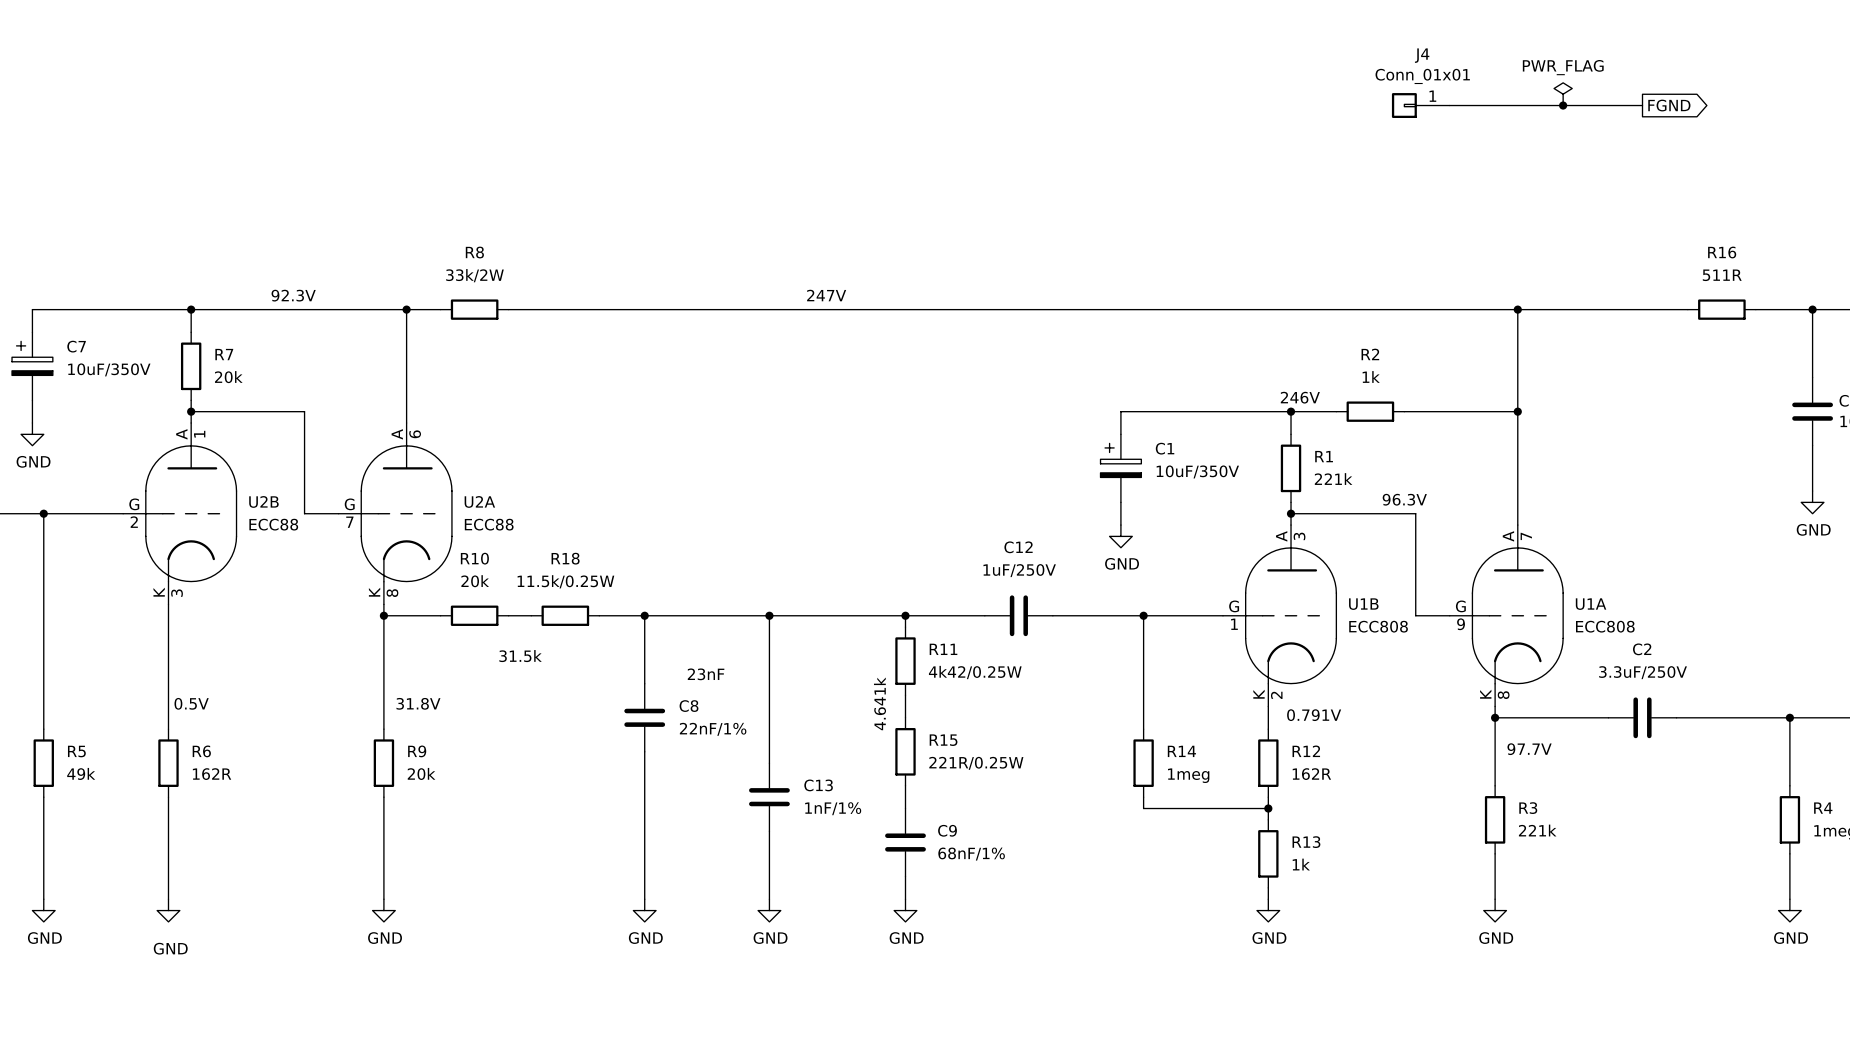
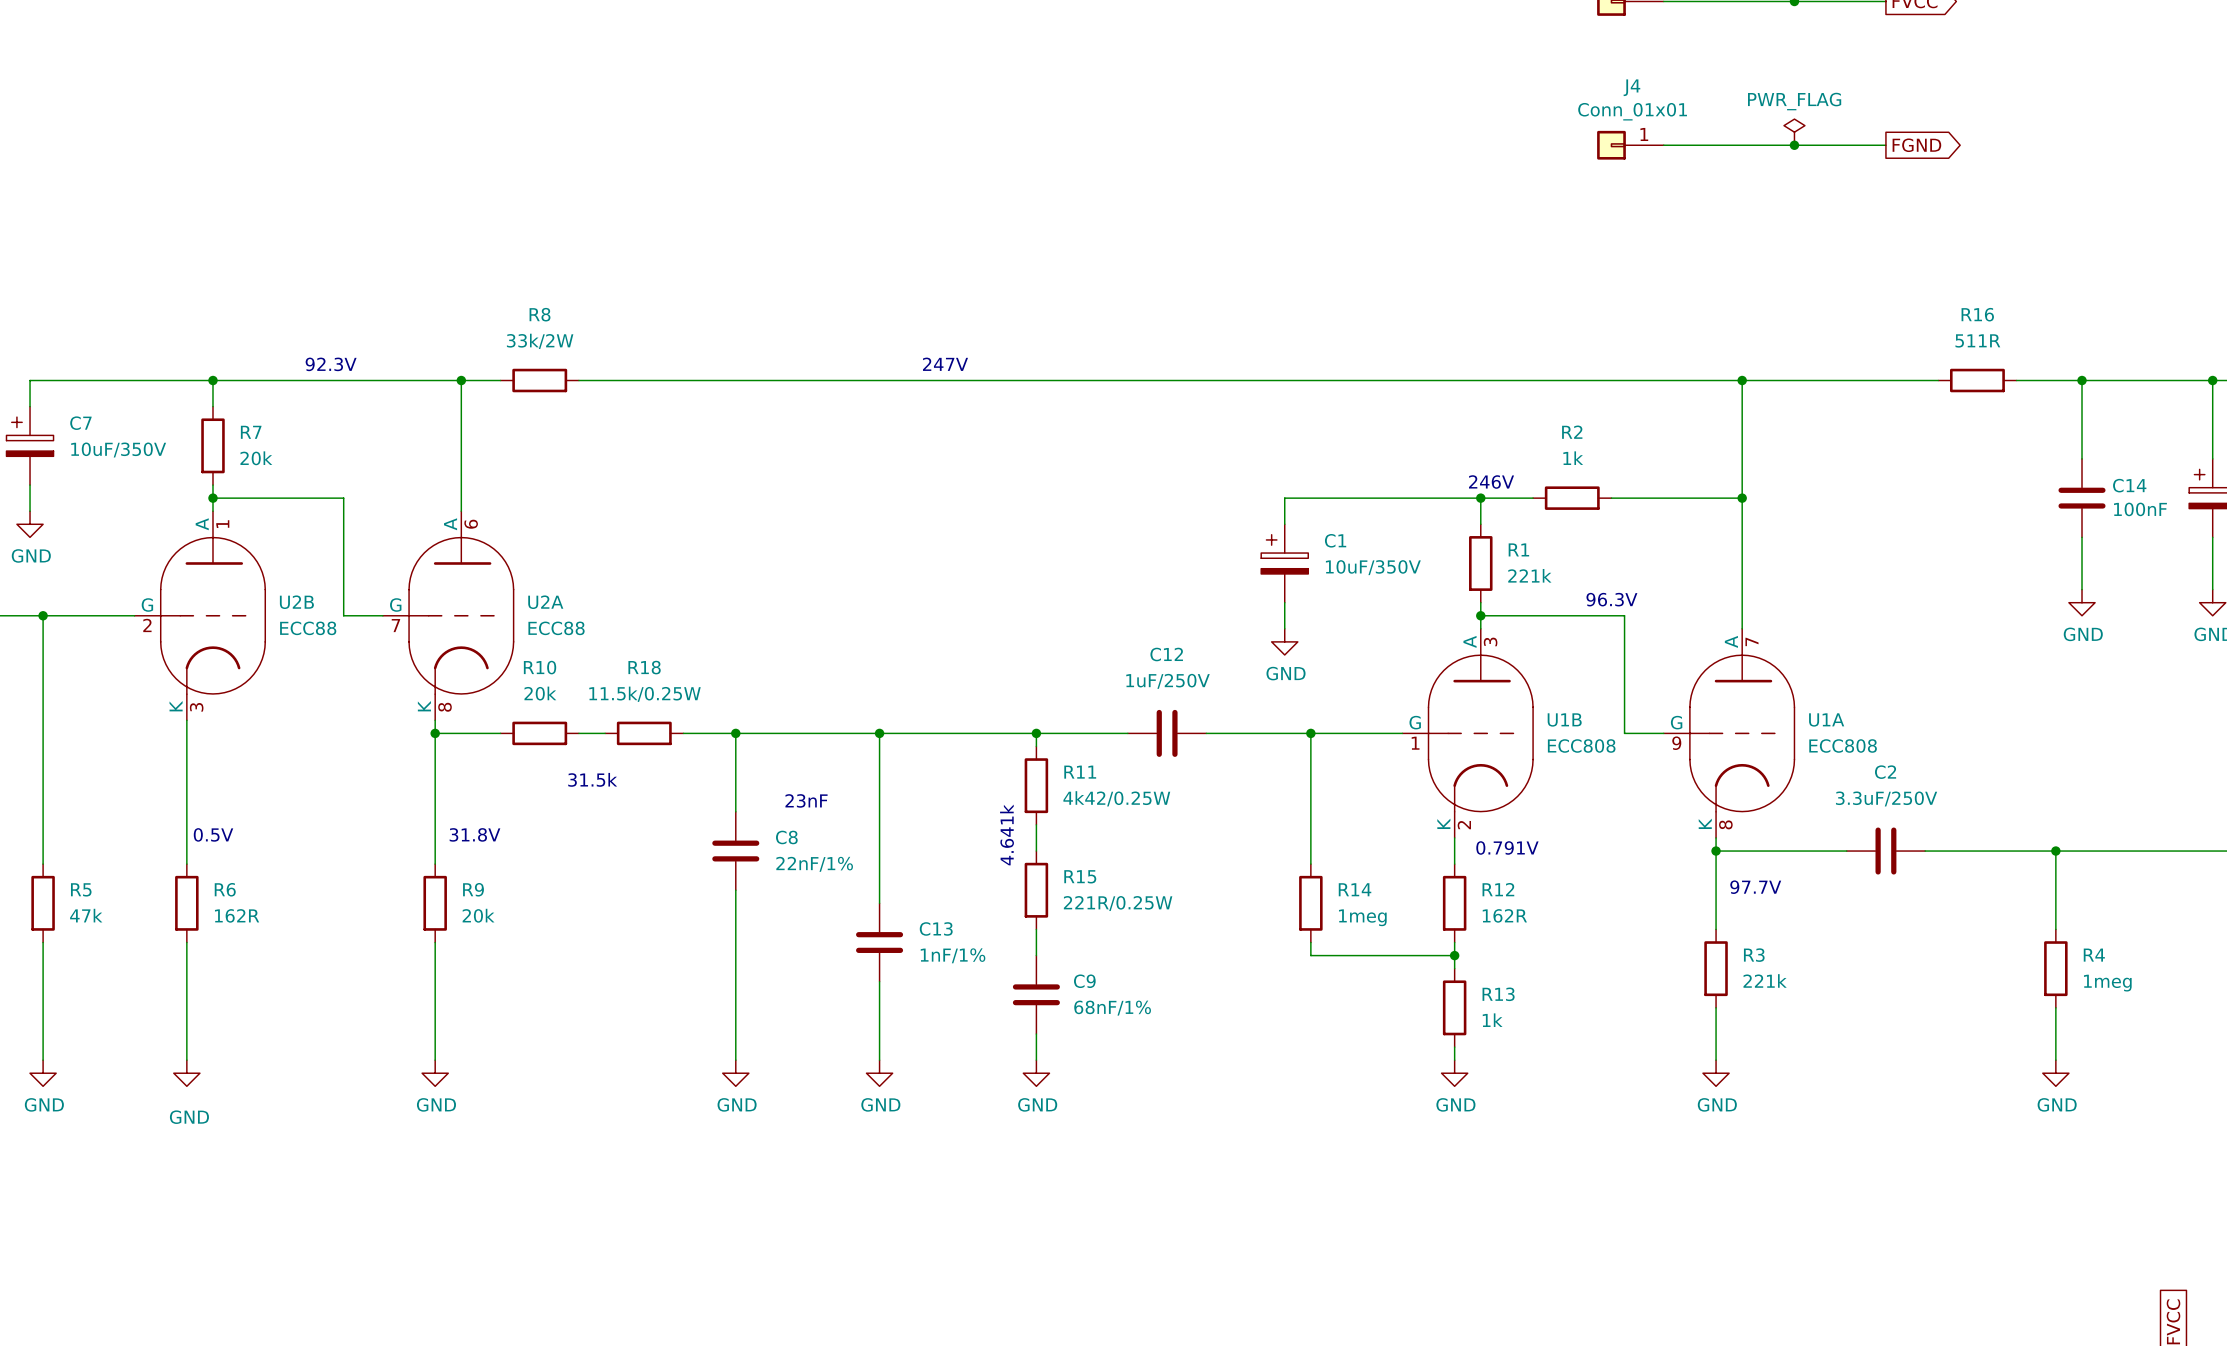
R5 value: 49k (81, 773) -> 47k (86, 915)

